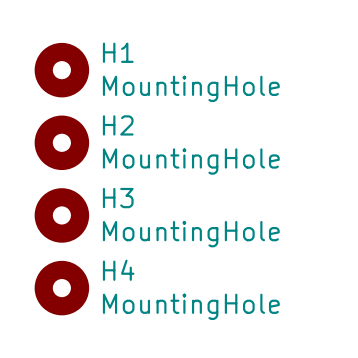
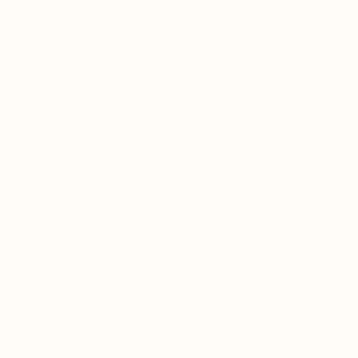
H1: MountingHole (61, 70) -> none
H2: MountingHole (61, 142) -> none
H3: MountingHole (61, 215) -> none
H4: MountingHole (61, 288) -> none

